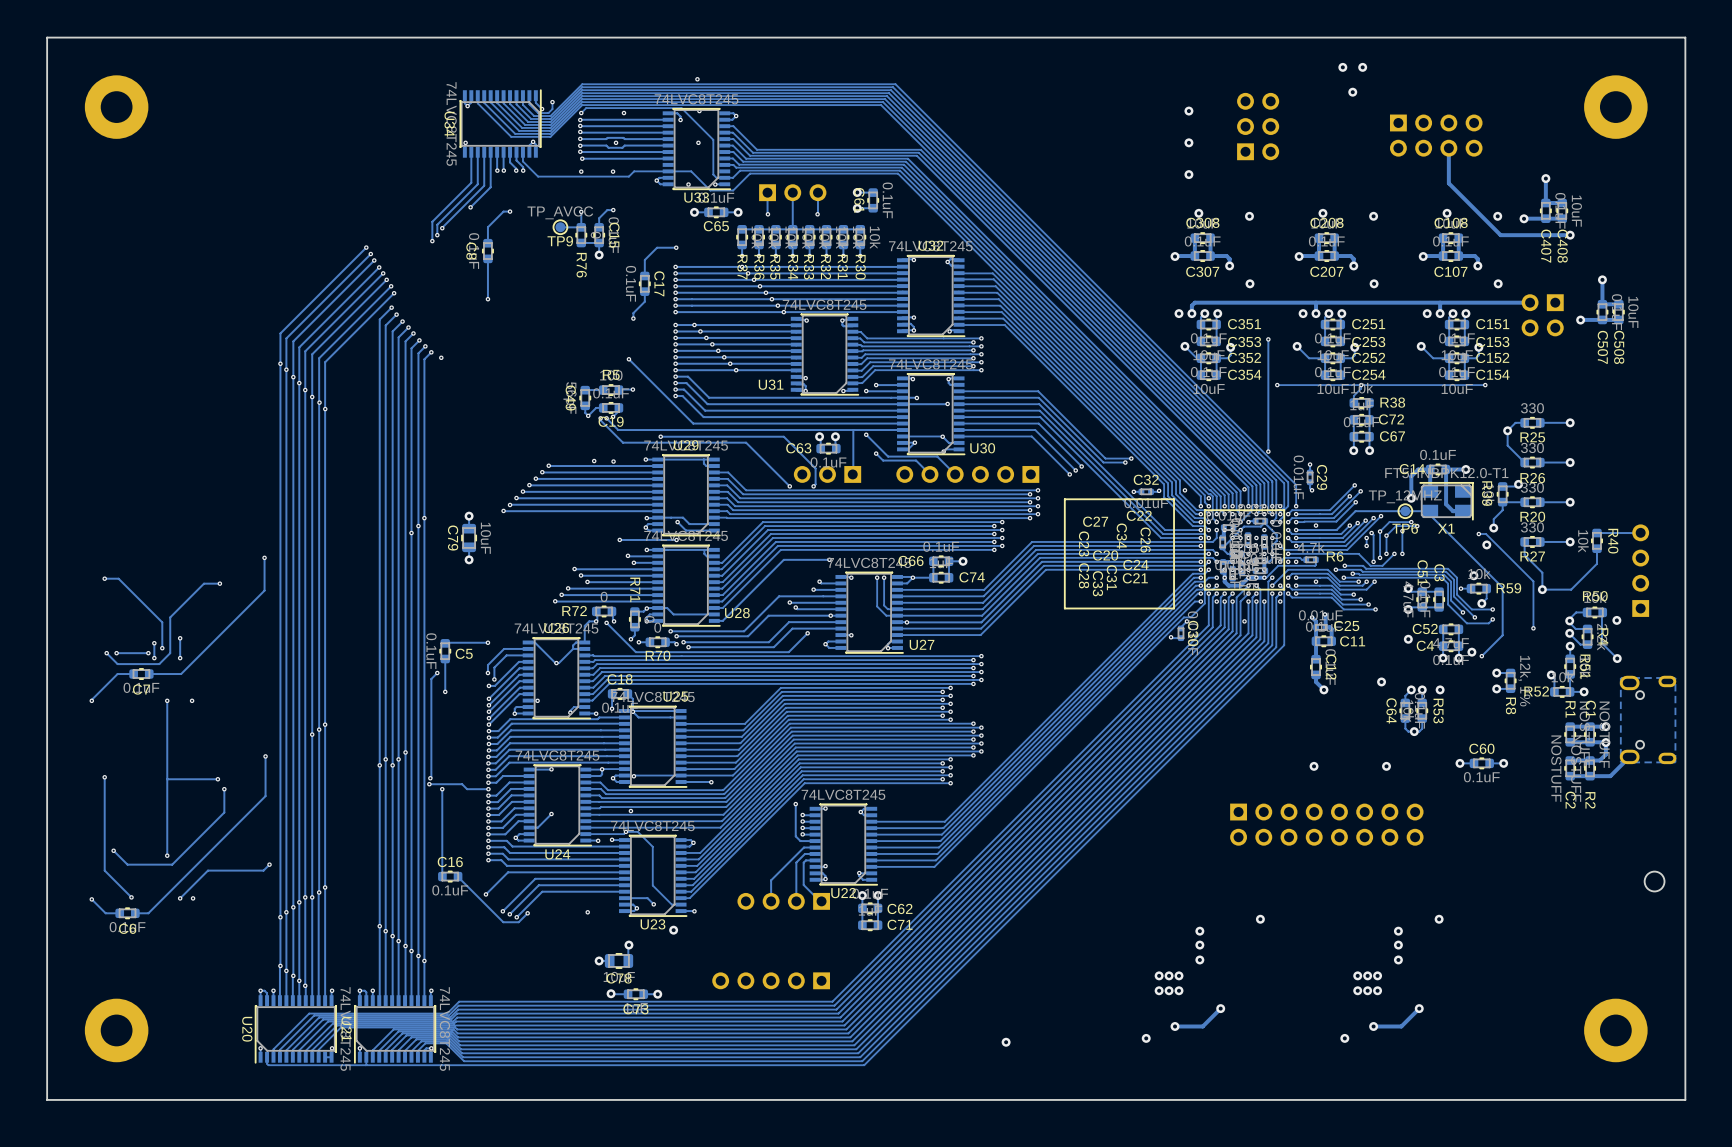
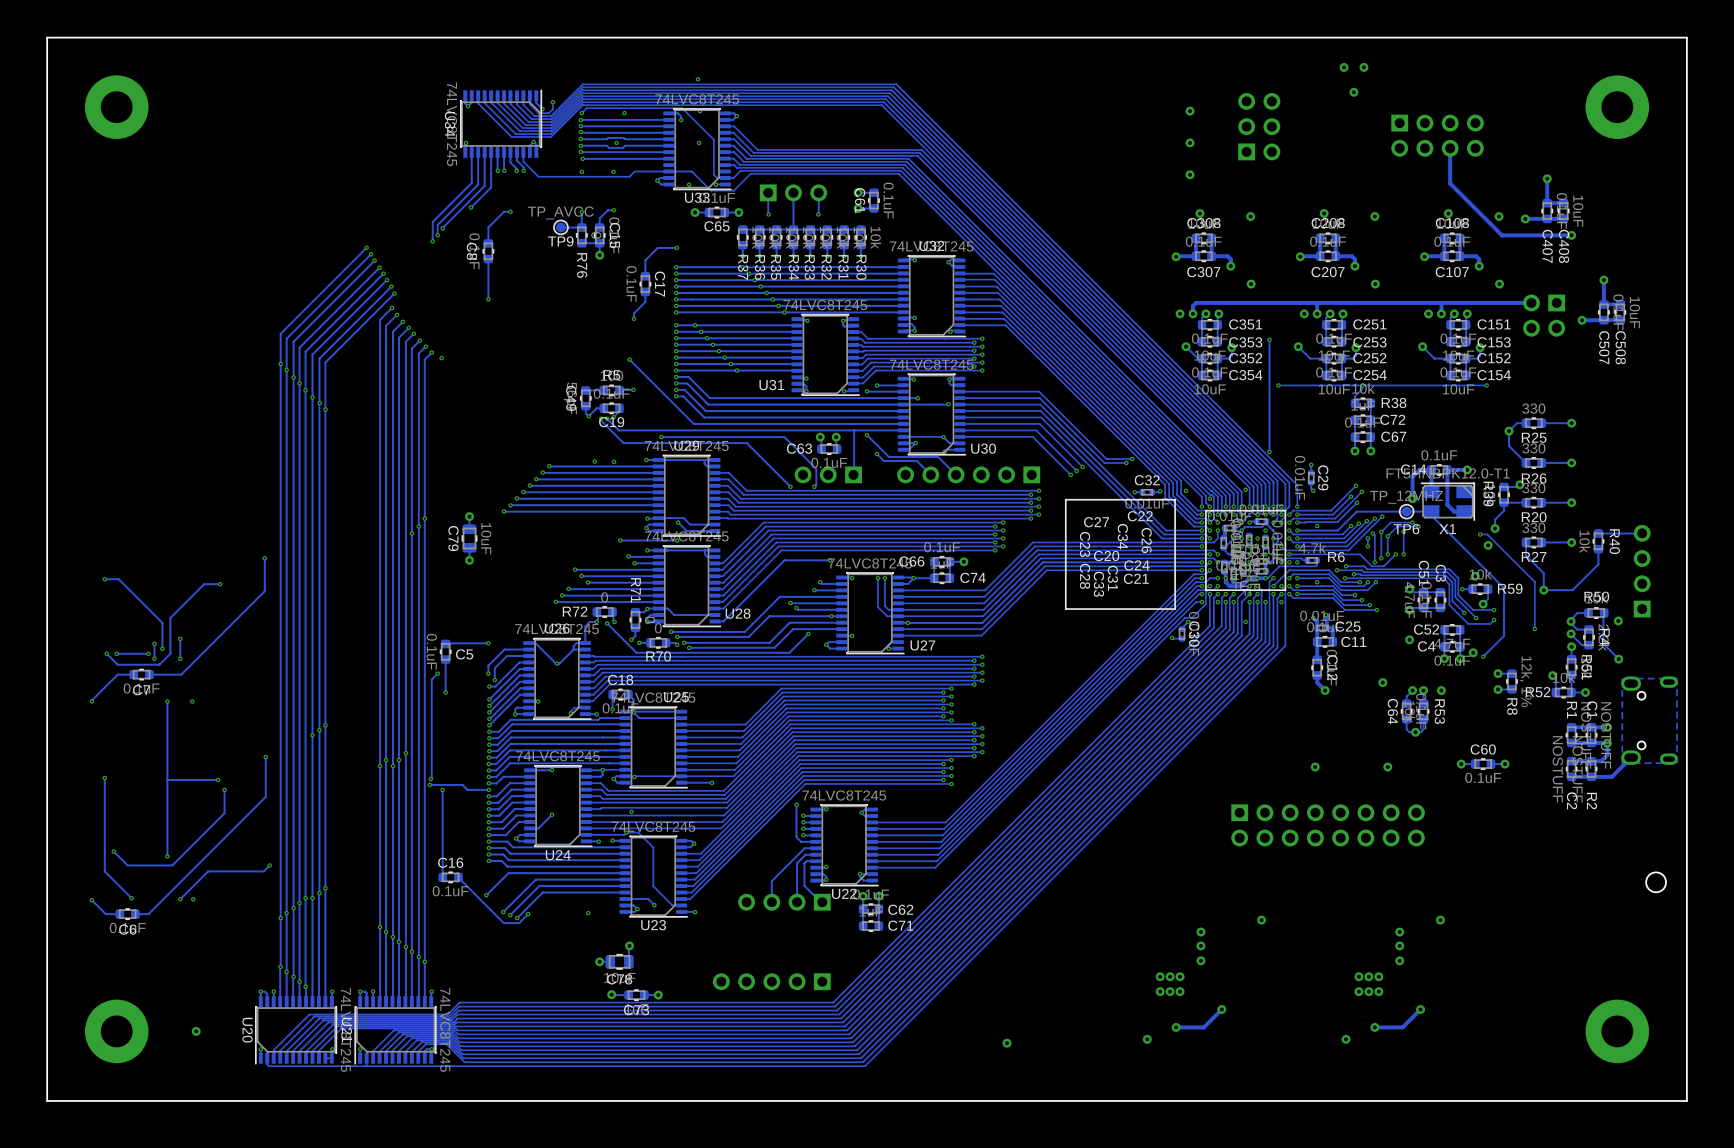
via: (673, 930) -> none
via: none -> (196, 1031)

